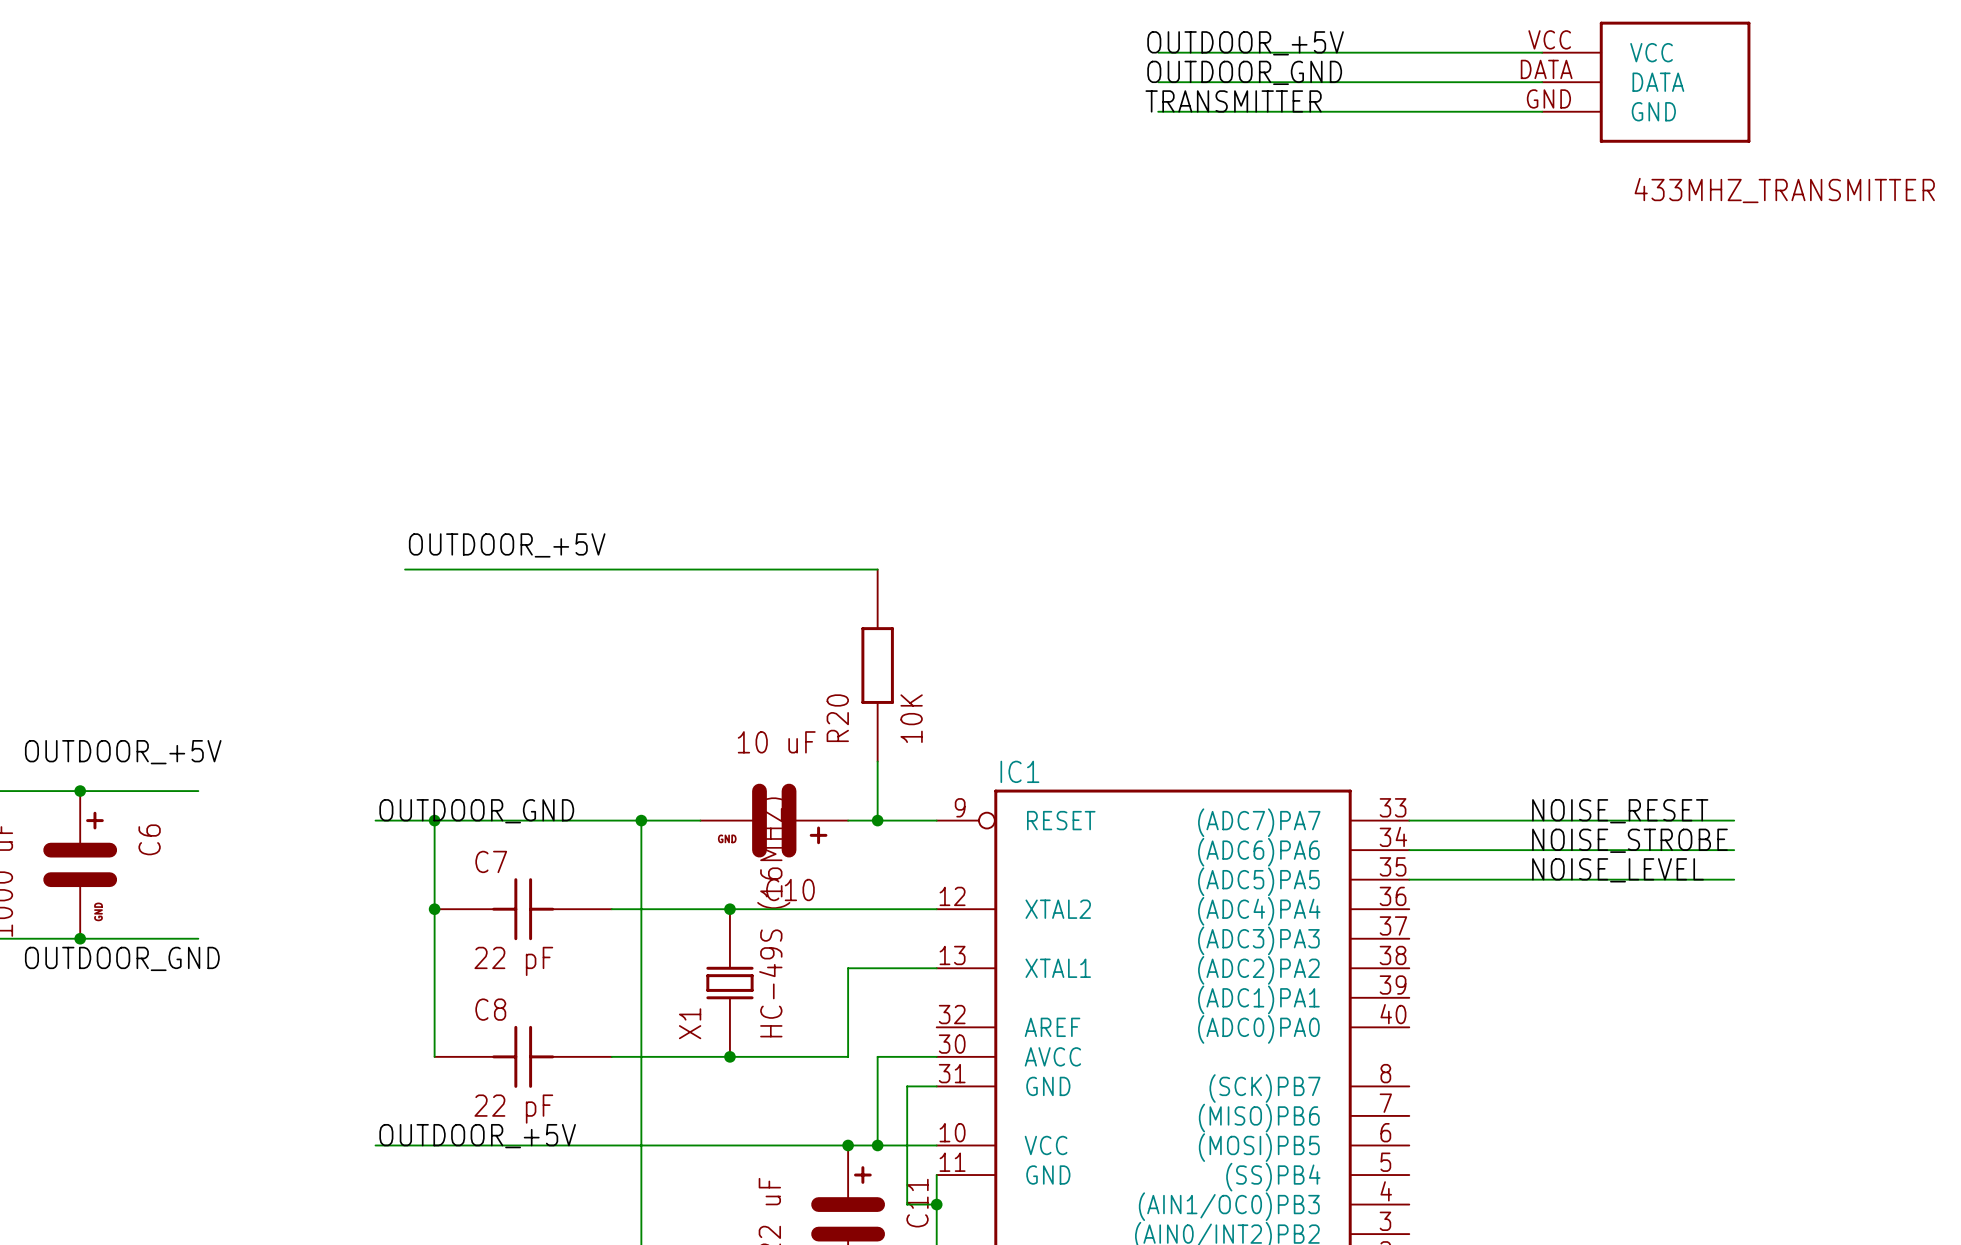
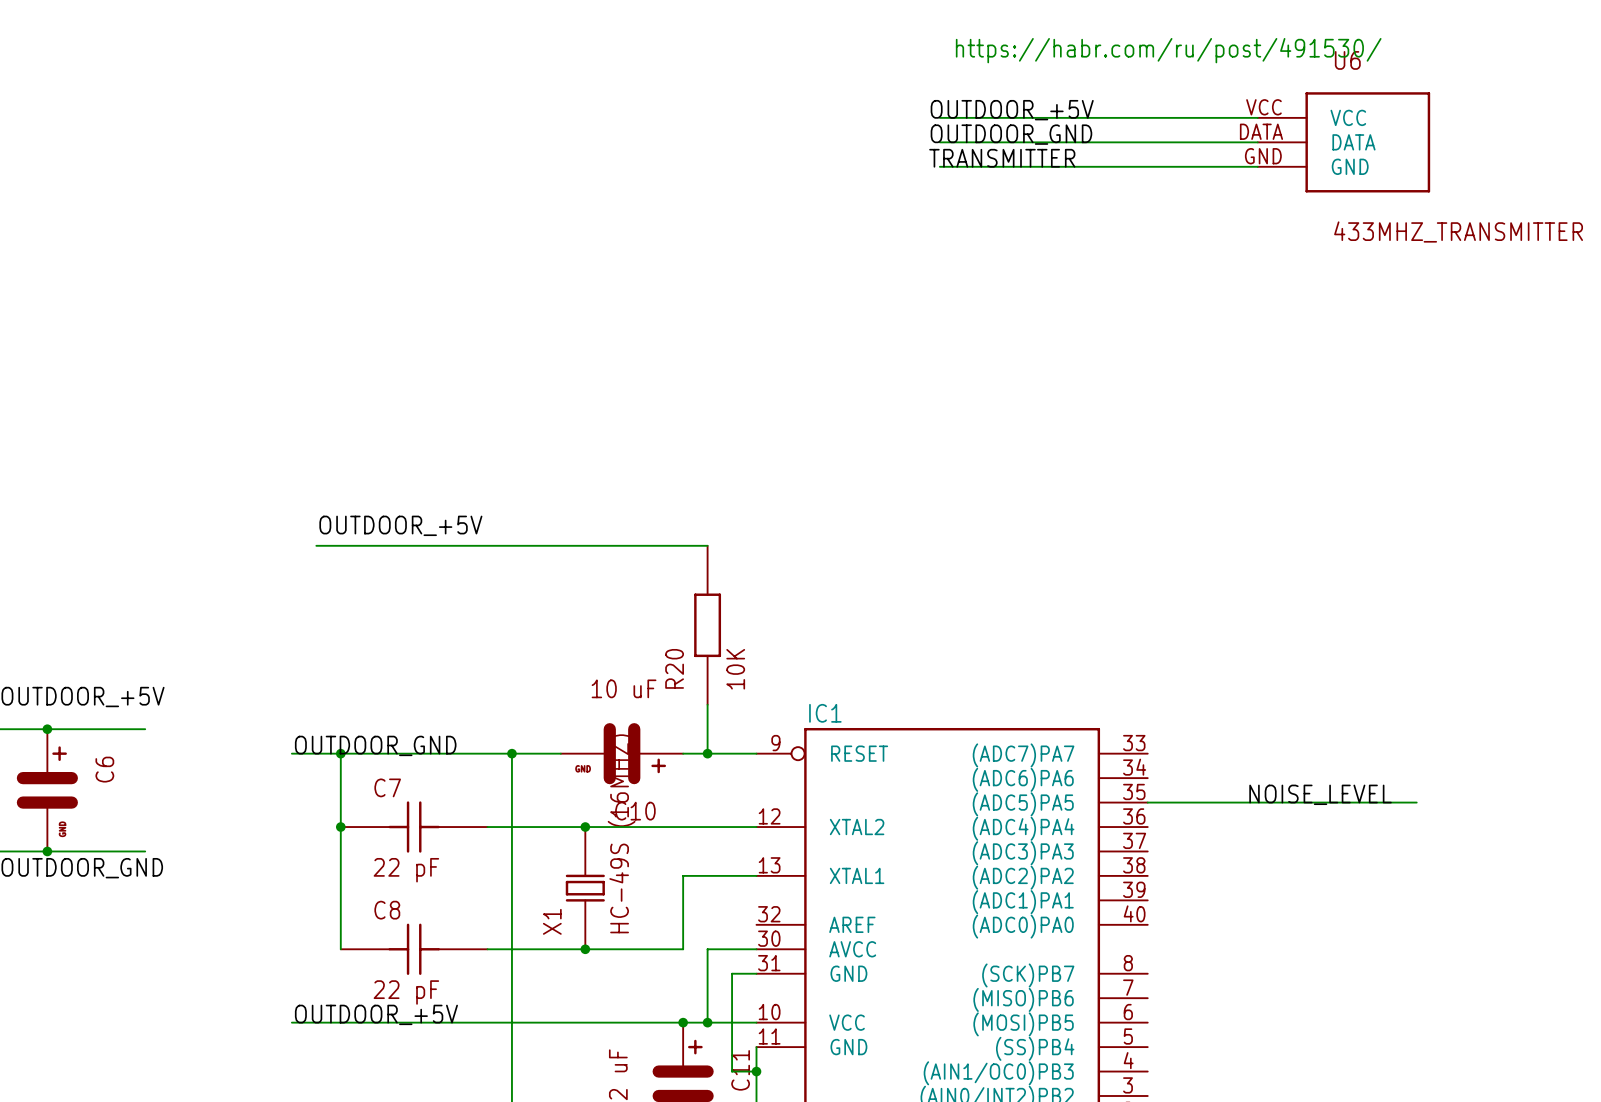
label: NOISE_RESET (1620, 811) -> none
wire: (1409, 820) (1734, 820) -> none
label: NOISE_STROBE (1629, 840) -> none
wire: (1409, 850) (1734, 850) -> none

